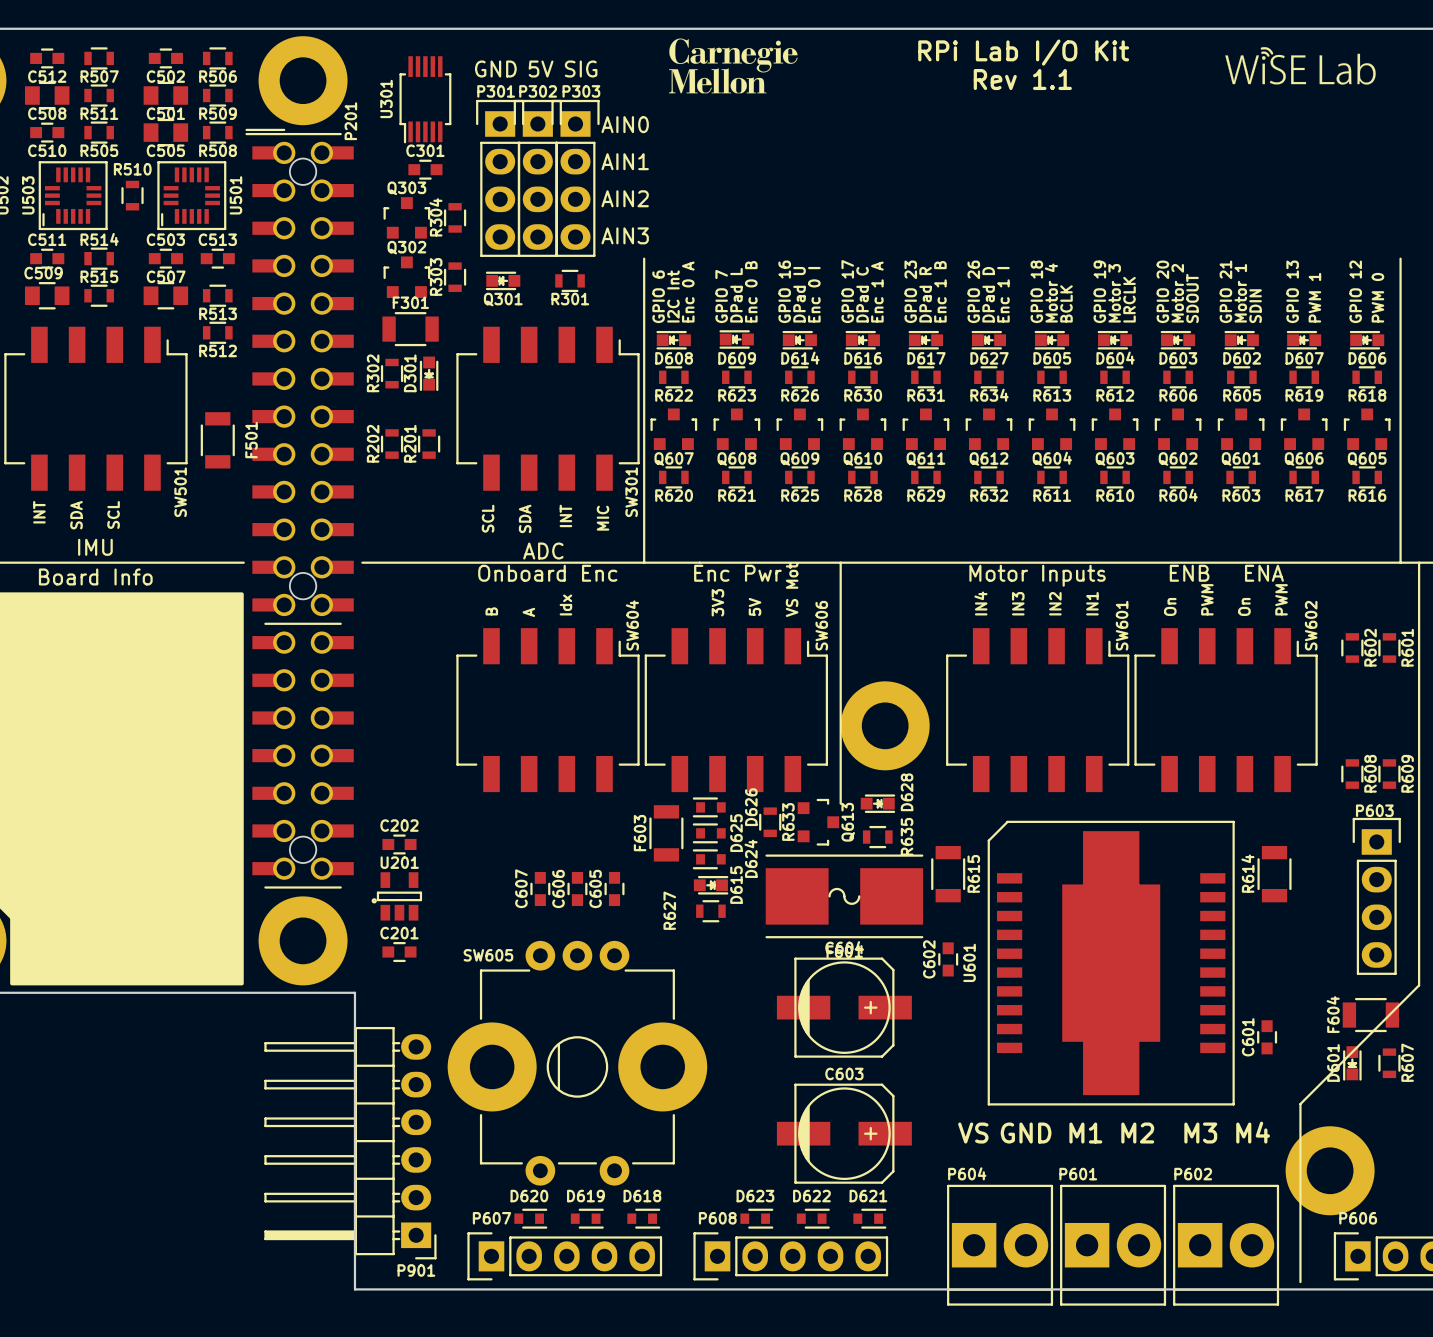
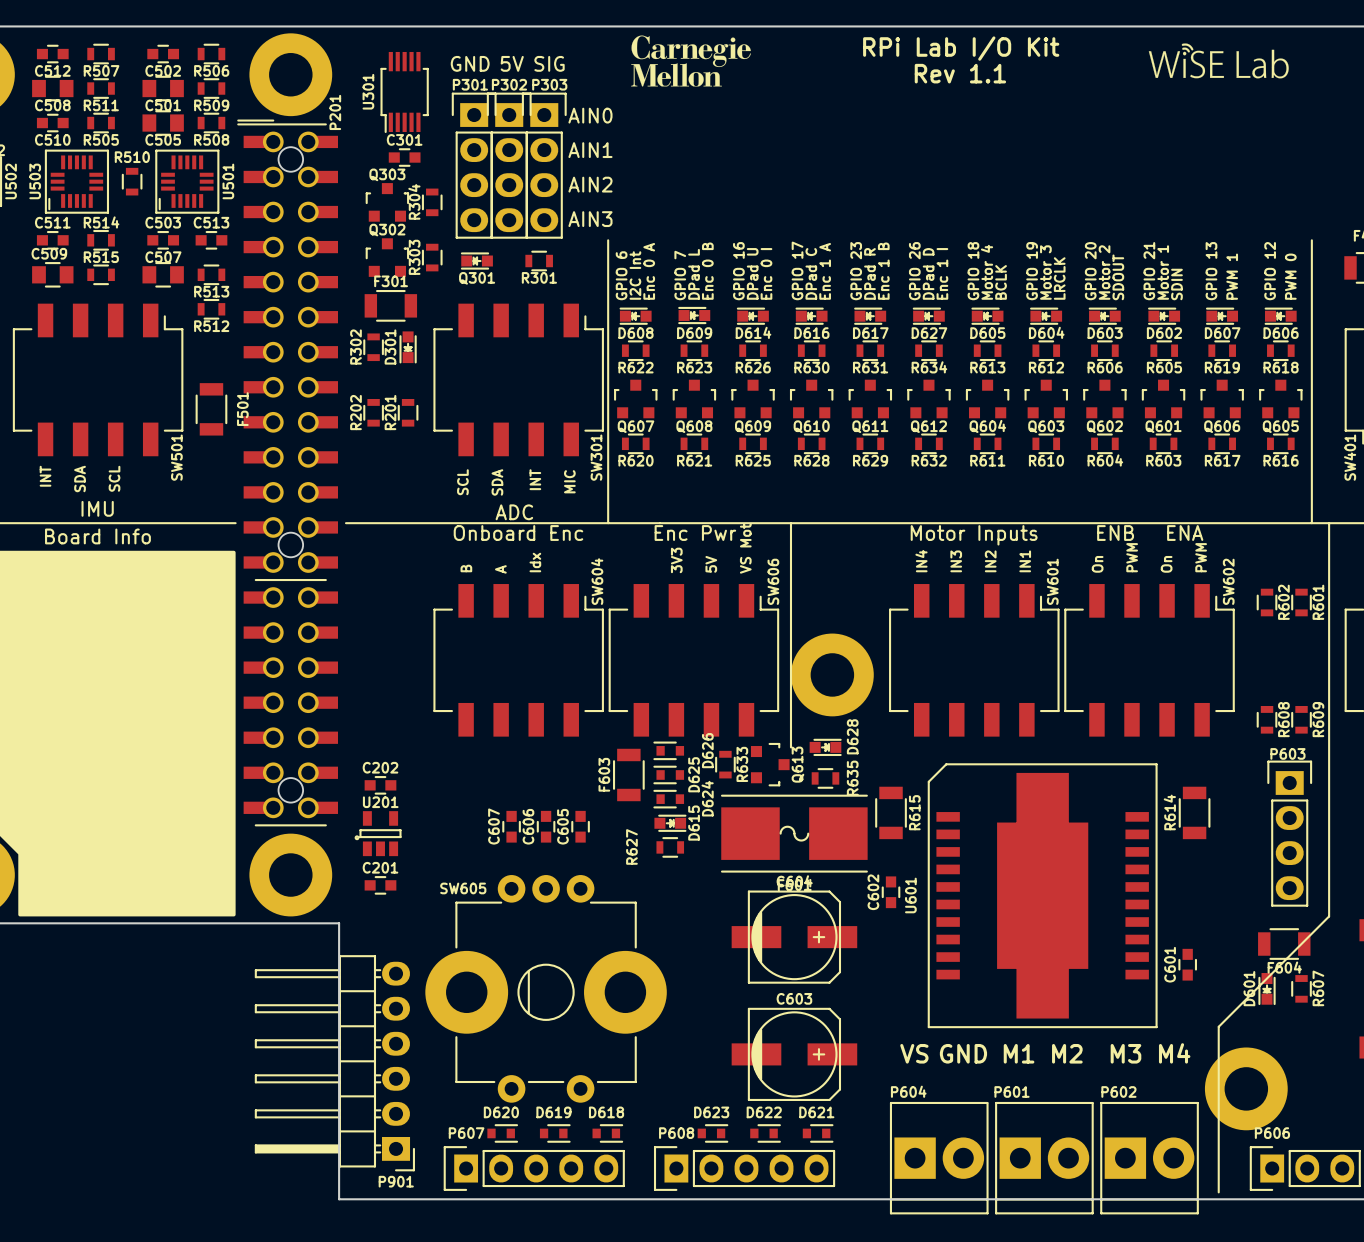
F604 name rotation: 0° (1333, 1014) -> 90° clockwise (1284, 967)
F604 name position: F604 (1333, 1014) -> F604 (1284, 967)

